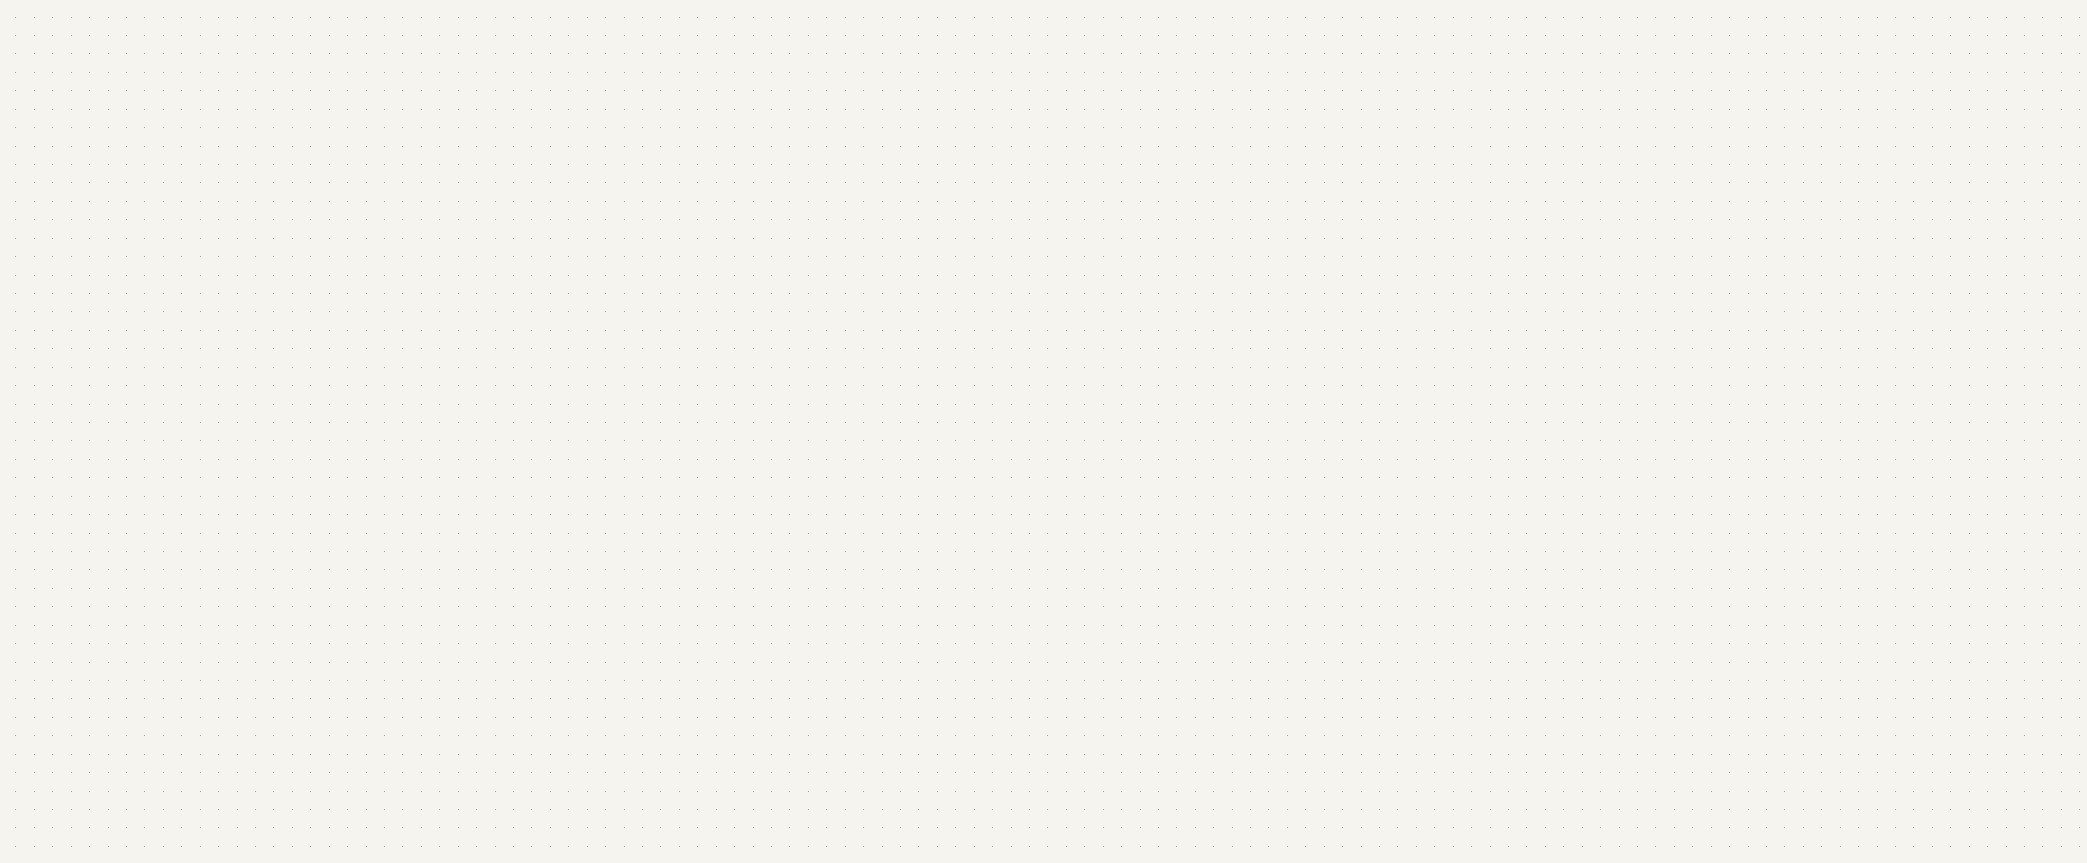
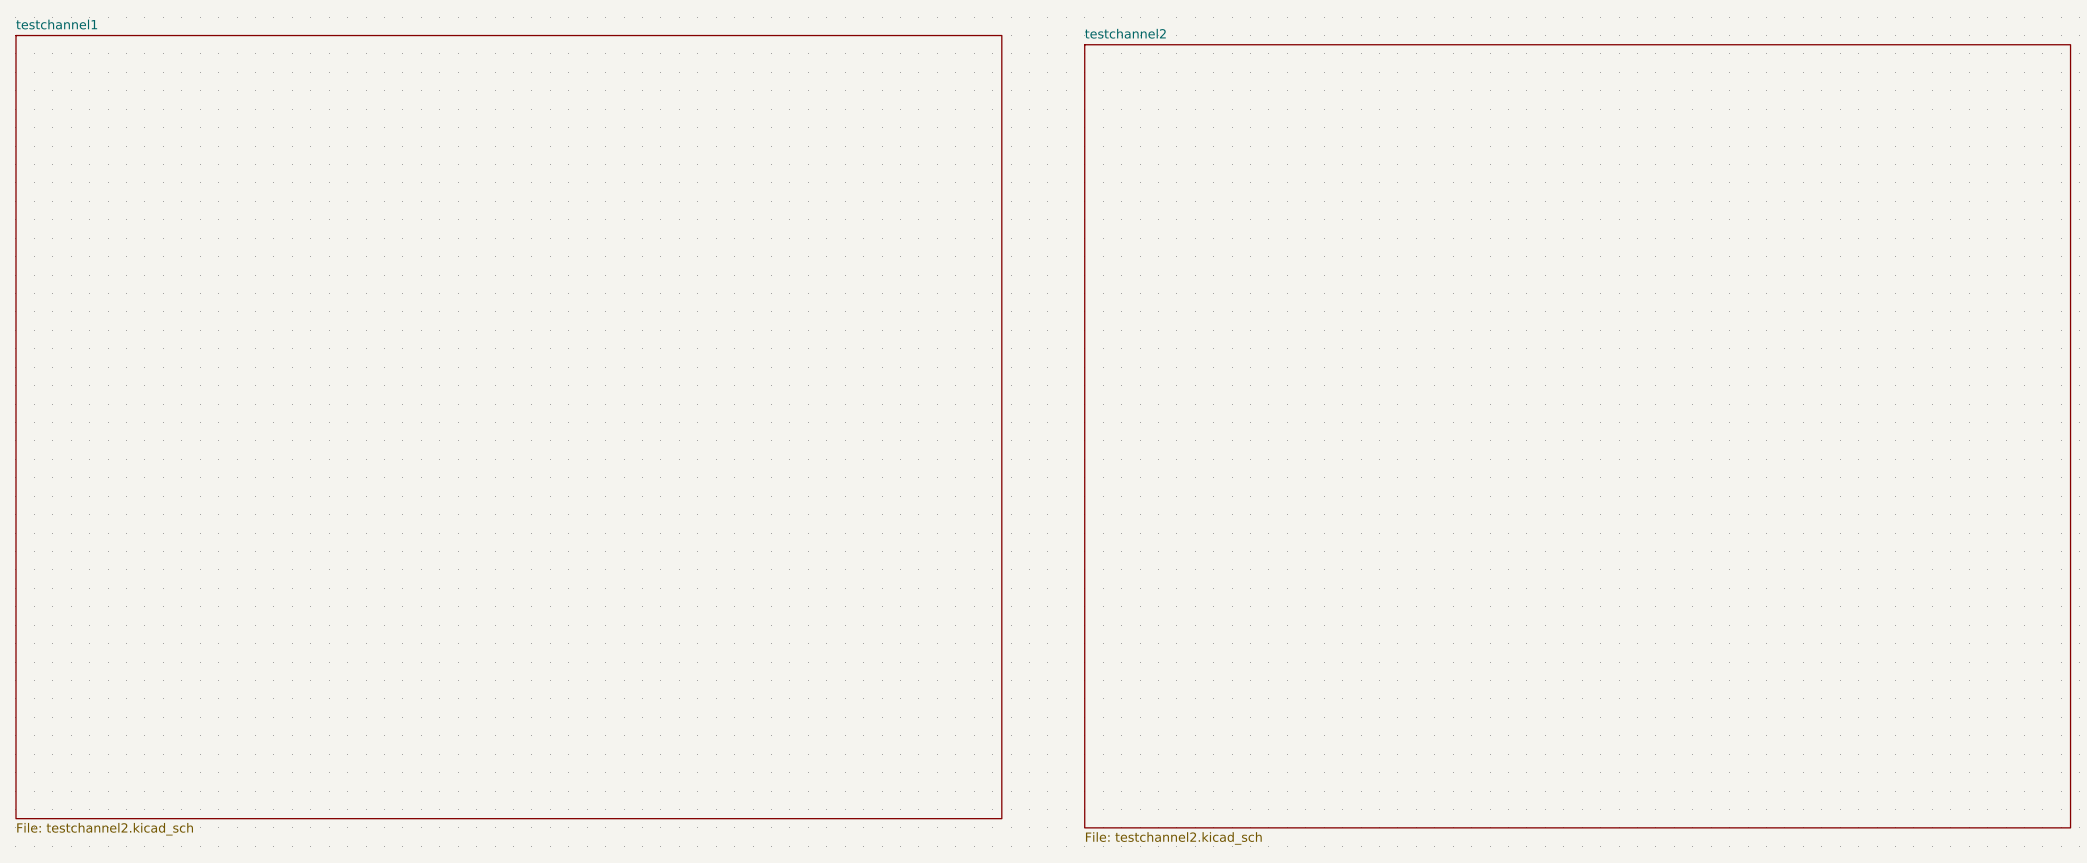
sheet testchannel1: none -> File: testchannel2.kicad_sch (508, 427)
sheet testchannel2: none -> File: testchannel2.kicad_sch (1577, 436)

